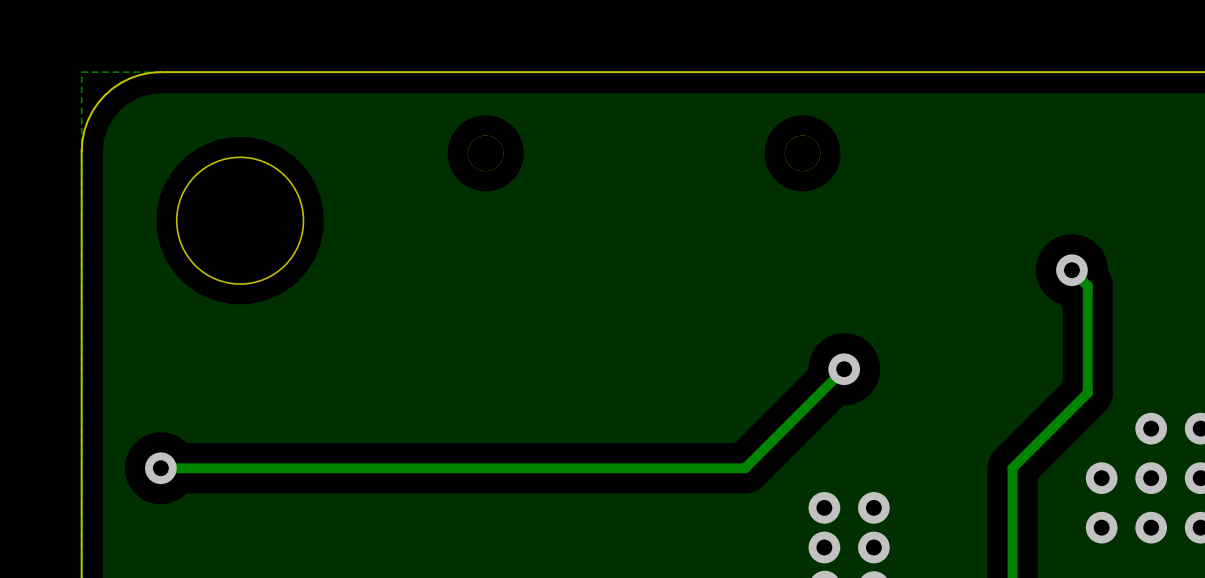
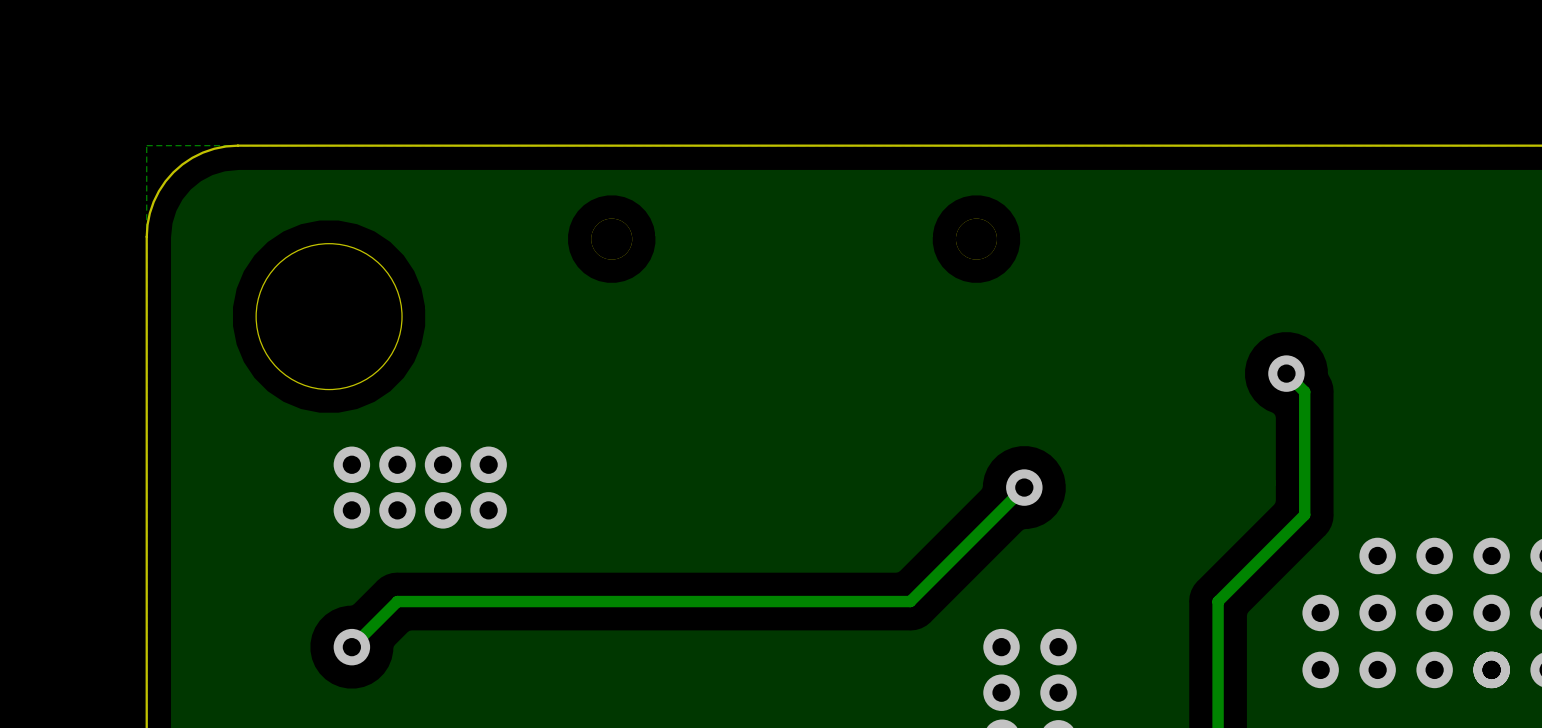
via: none -> (351, 464)
via: none -> (397, 464)
via: none -> (443, 464)
via: none -> (488, 464)
via: none -> (351, 510)
via: none -> (397, 510)
via: none -> (443, 510)
via: none -> (488, 510)
via: (160, 468) -> none
track: (299, 468) (160, 468) -> (397, 601) (351, 647)
via: none -> (351, 647)

